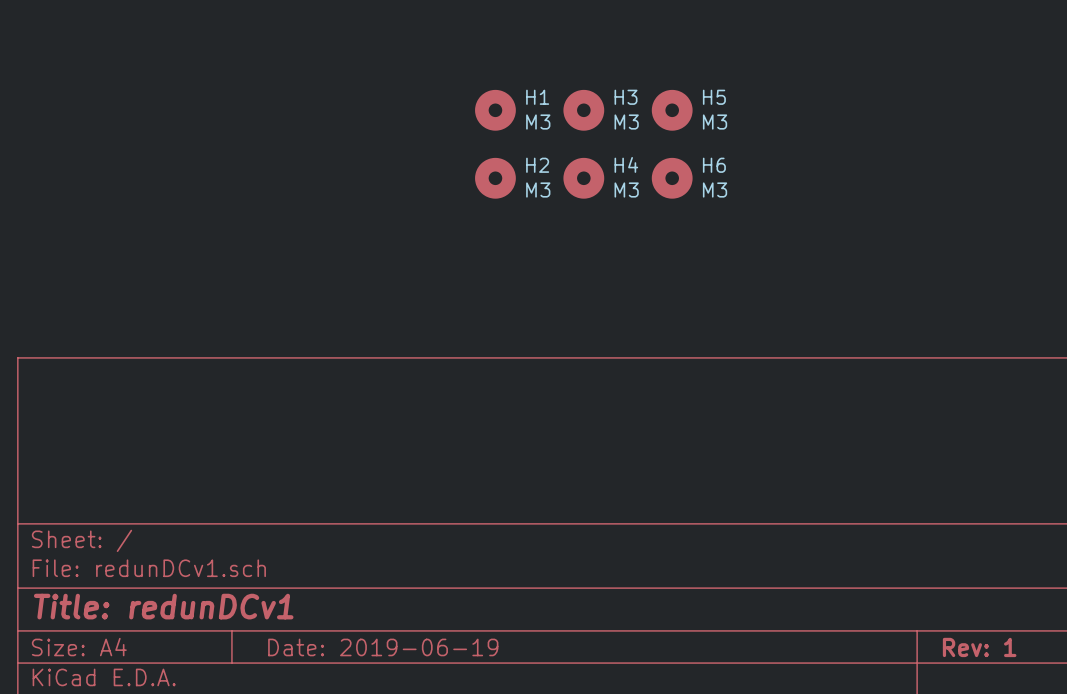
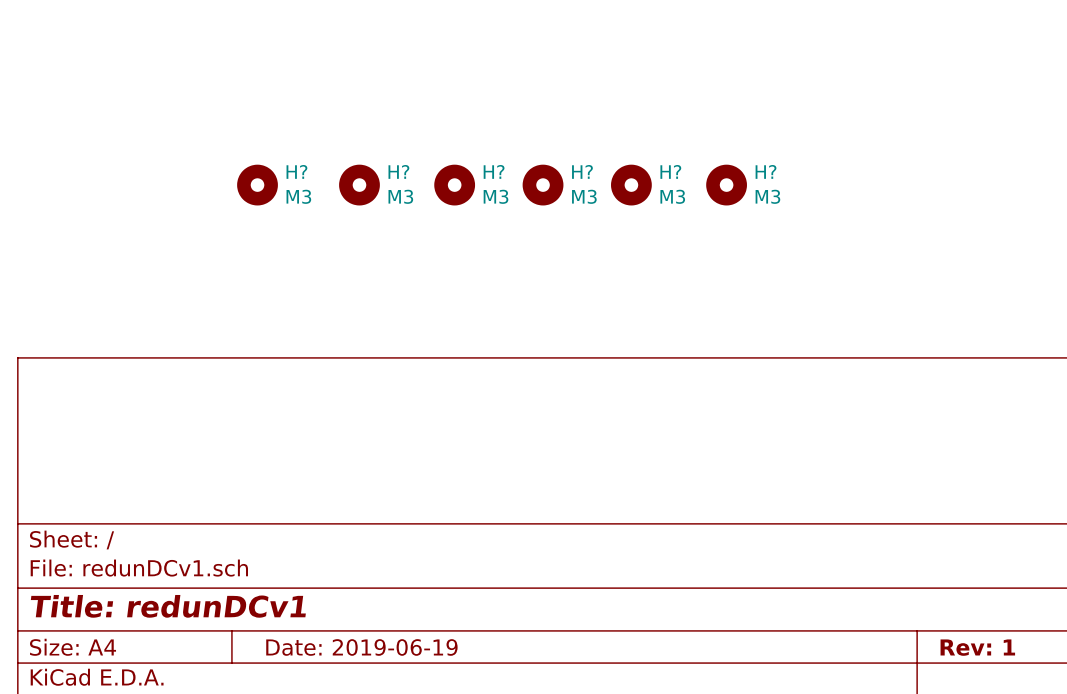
H1: M3 (495, 110) -> none
H3: M3 (583, 110) -> none
H5: M3 (672, 110) -> none
H2: M3 (495, 178) -> none
H4: M3 (583, 178) -> none
H6: M3 (672, 178) -> none
H?: none -> M3 (257, 185)
H?: none -> M3 (359, 185)
H?: none -> M3 (454, 185)
H?: none -> M3 (543, 185)
H?: none -> M3 (631, 185)
H?: none -> M3 (726, 185)

